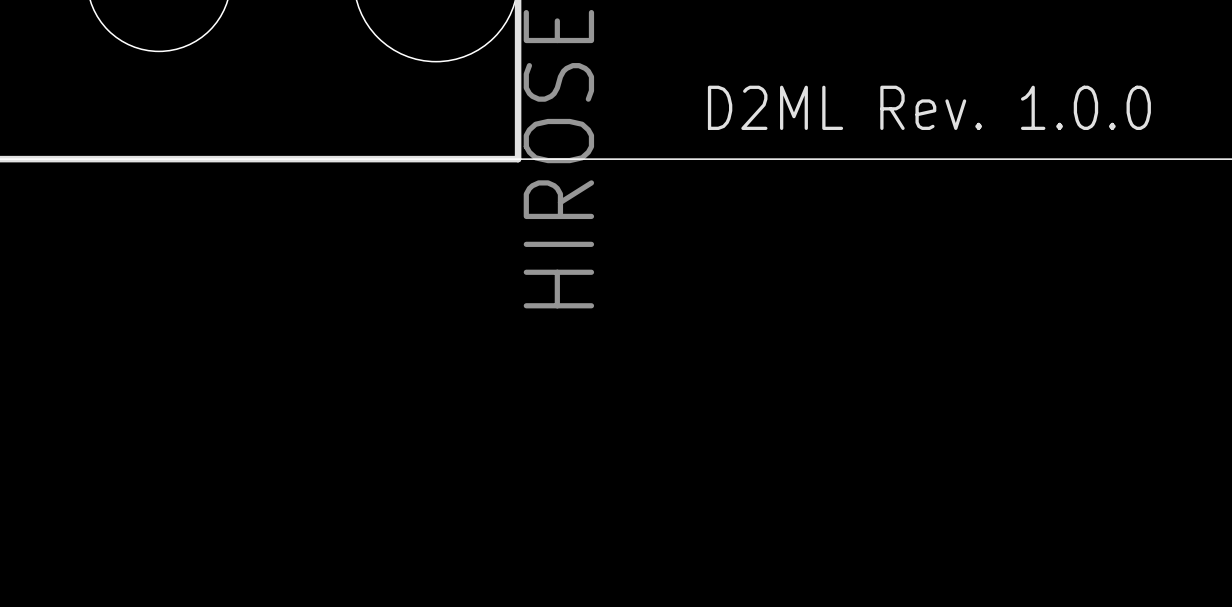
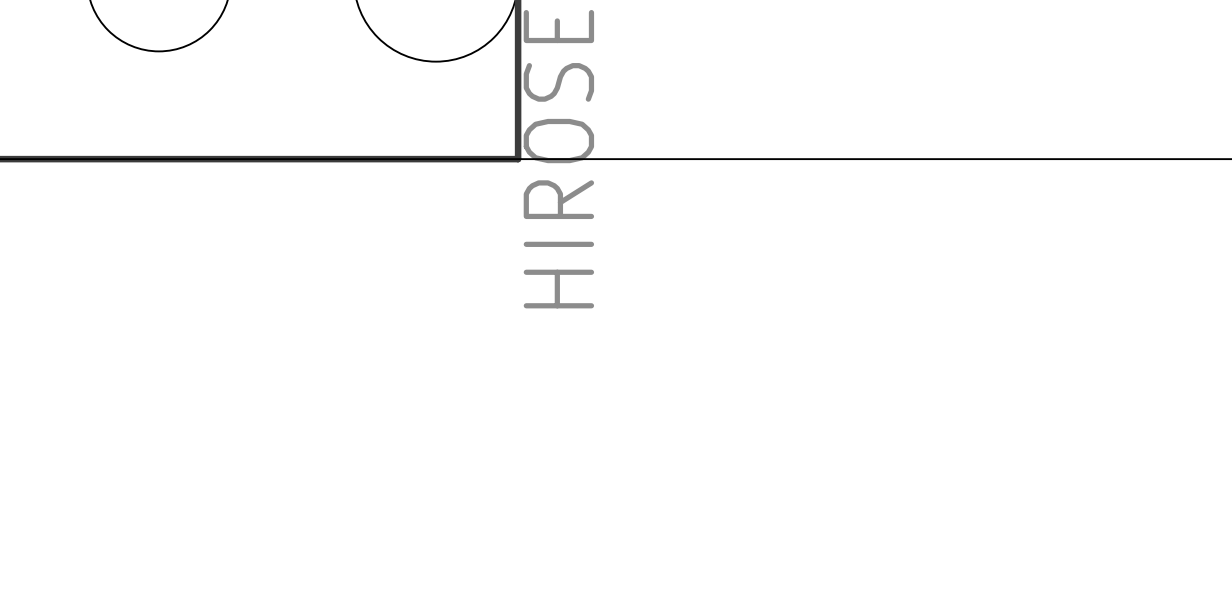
text: D2ML Rev. 1.0.0 (929, 107) -> none

